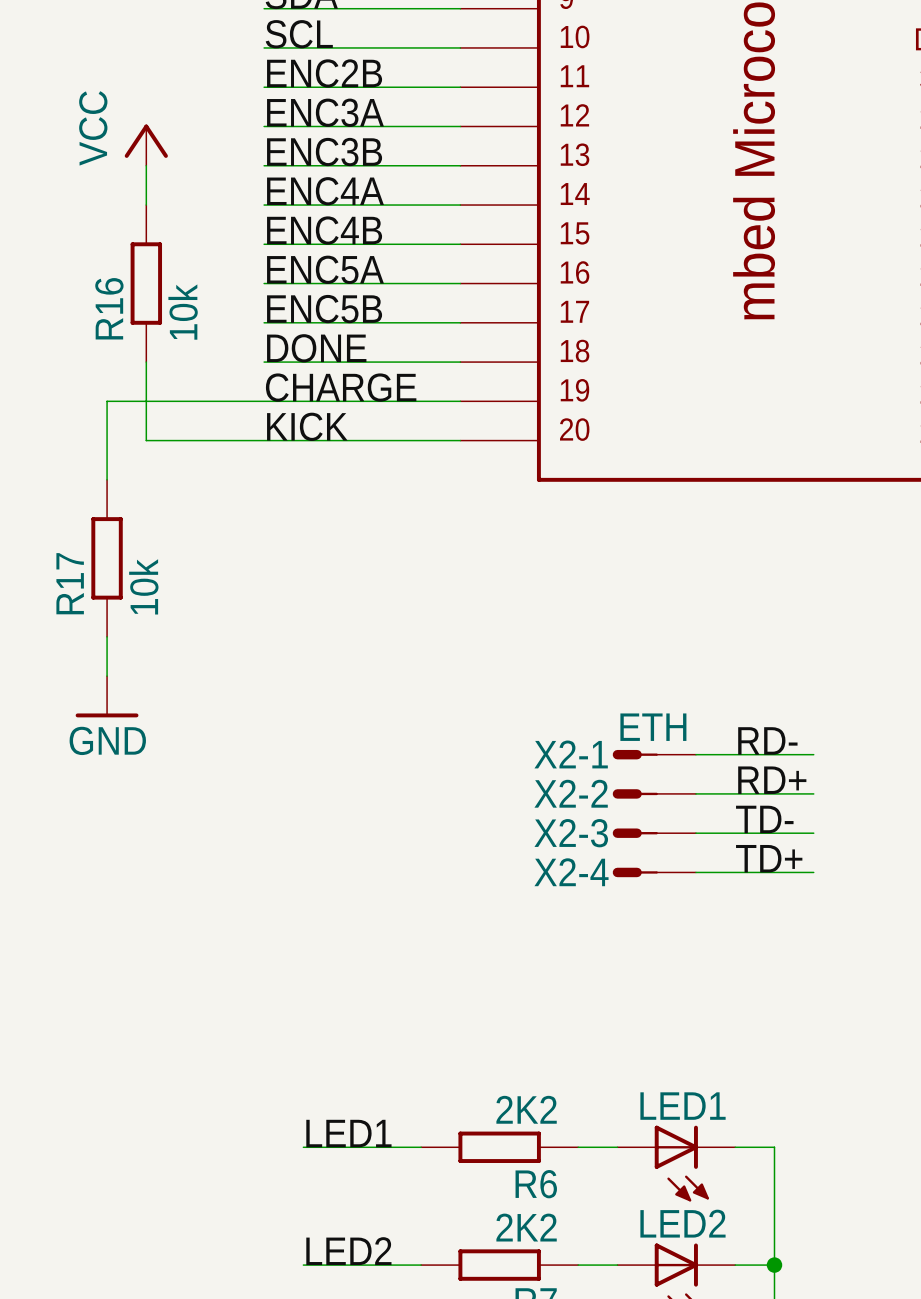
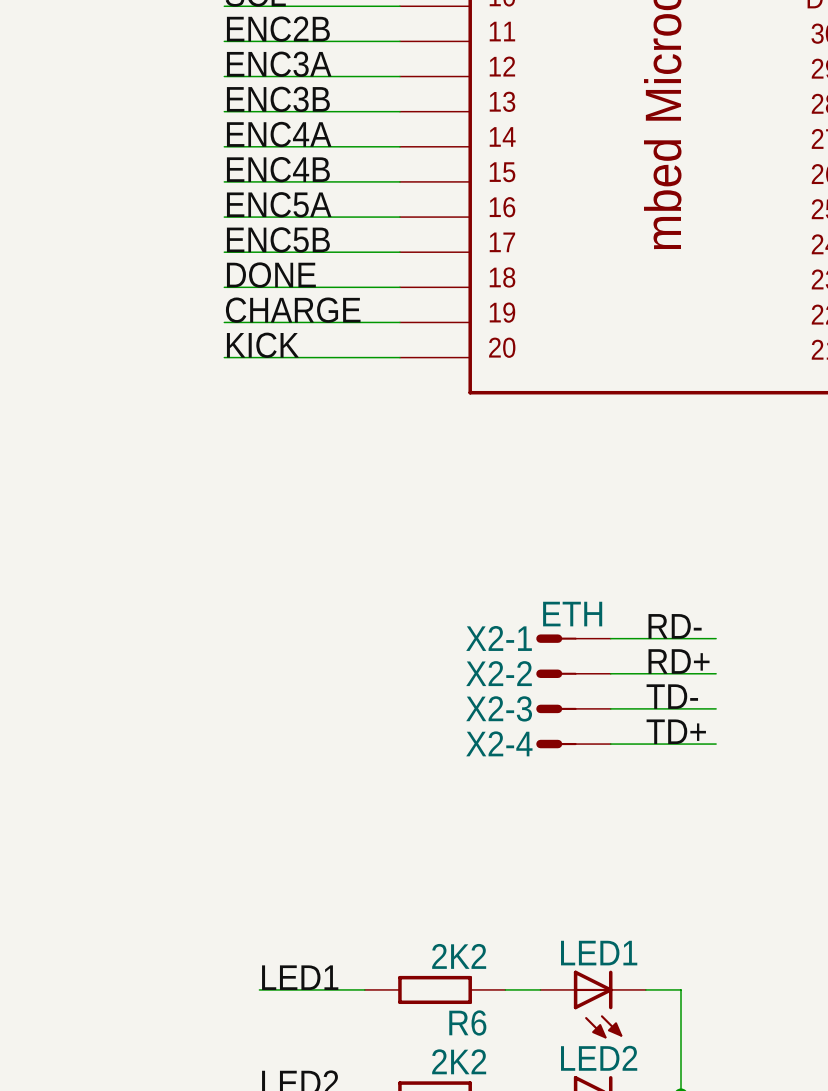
power symbol: VCC (146, 145) -> none
wire: (146, 165) (146, 205) -> none
R16: 10k (146, 283) -> none
wire: (146, 362) (146, 440) (264, 440) -> none
wire: (264, 401) (107, 401) (107, 479) -> none
R17: 10k (107, 558) -> none
wire: (107, 636) (107, 676) -> none
power symbol: GND (107, 696) -> none

